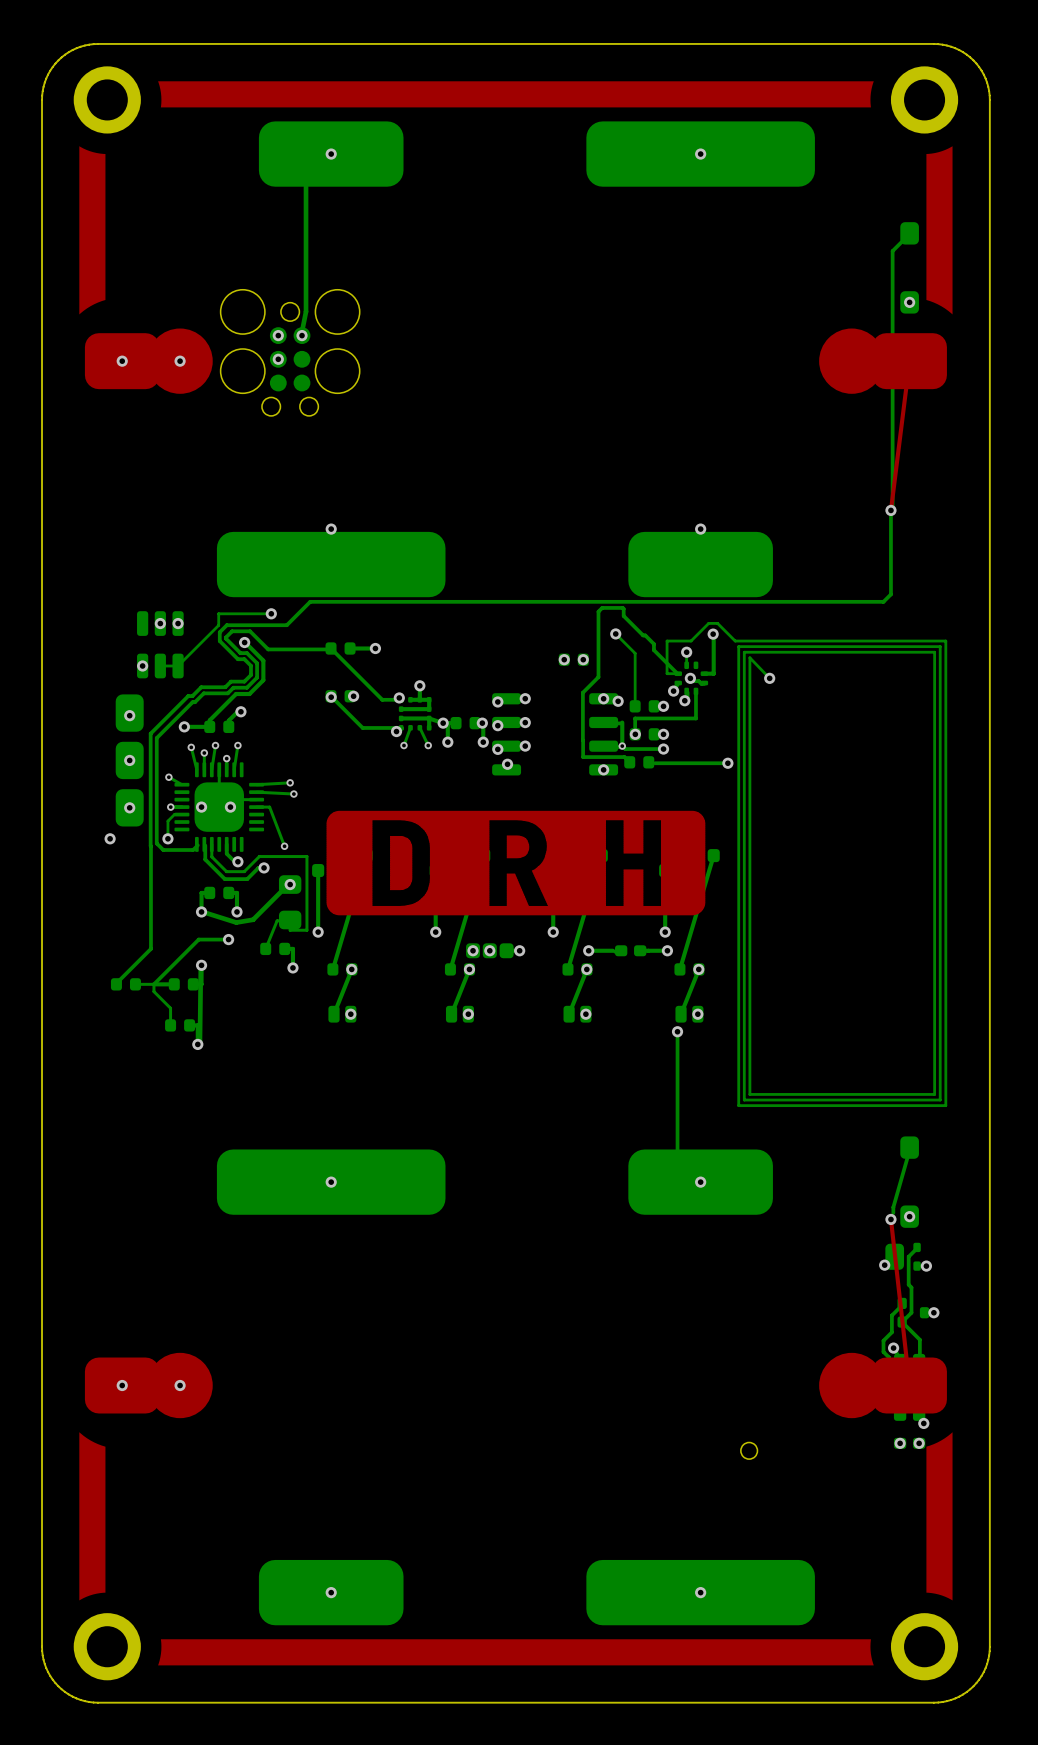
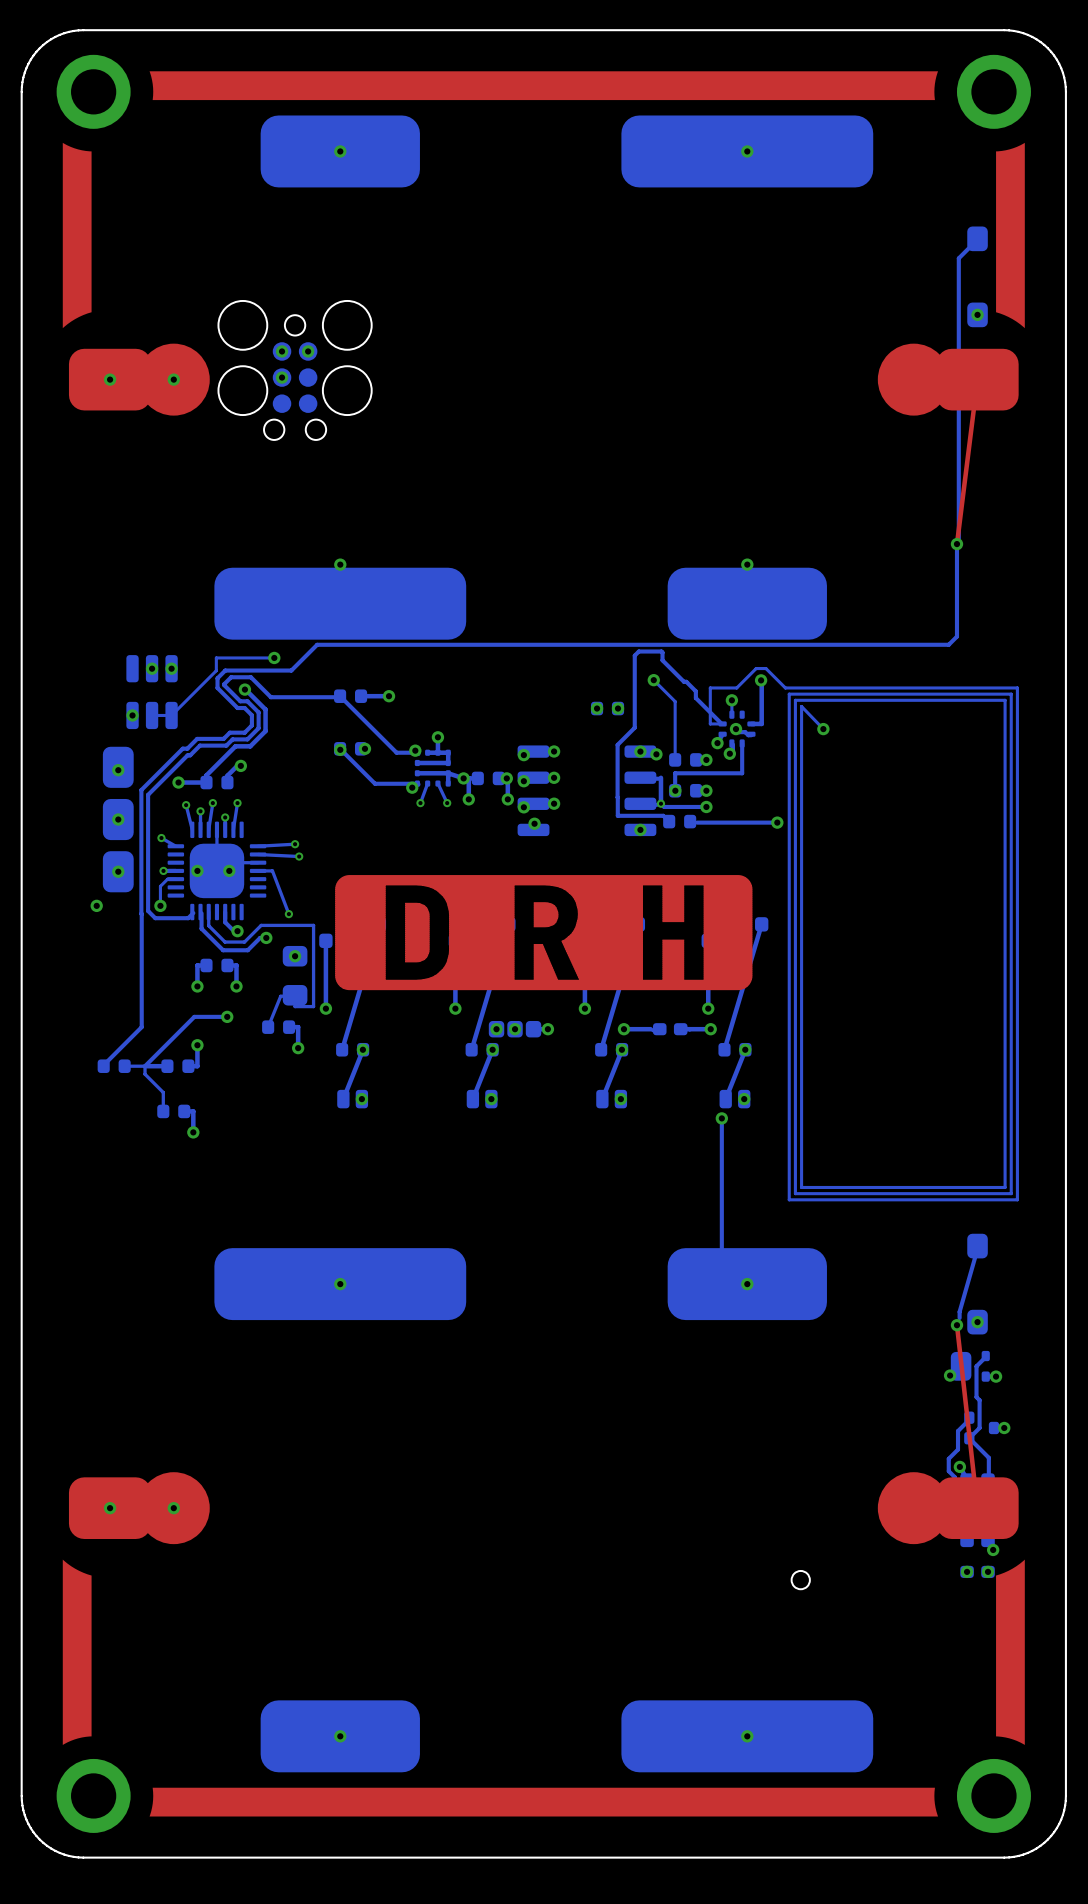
bottom track: (306, 186) (306, 311) (301, 335) -> none
bottom track: (287, 885) (253, 919) (236, 922) (200, 911) -> none
bottom track: (200, 964) (199, 1042) -> none

